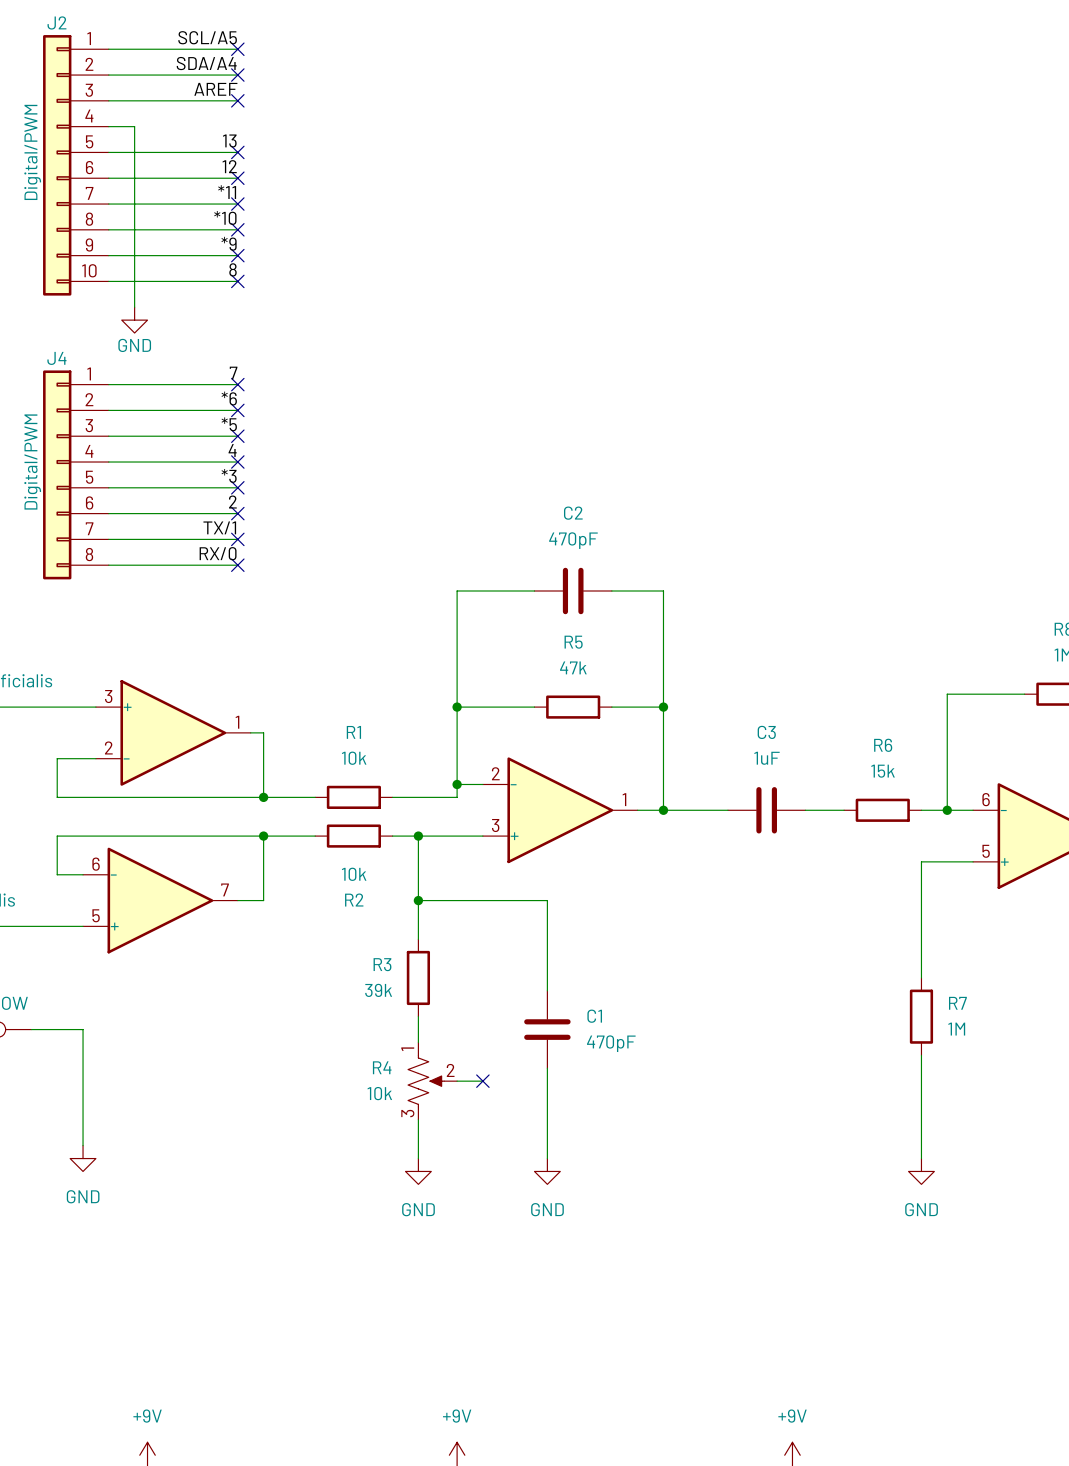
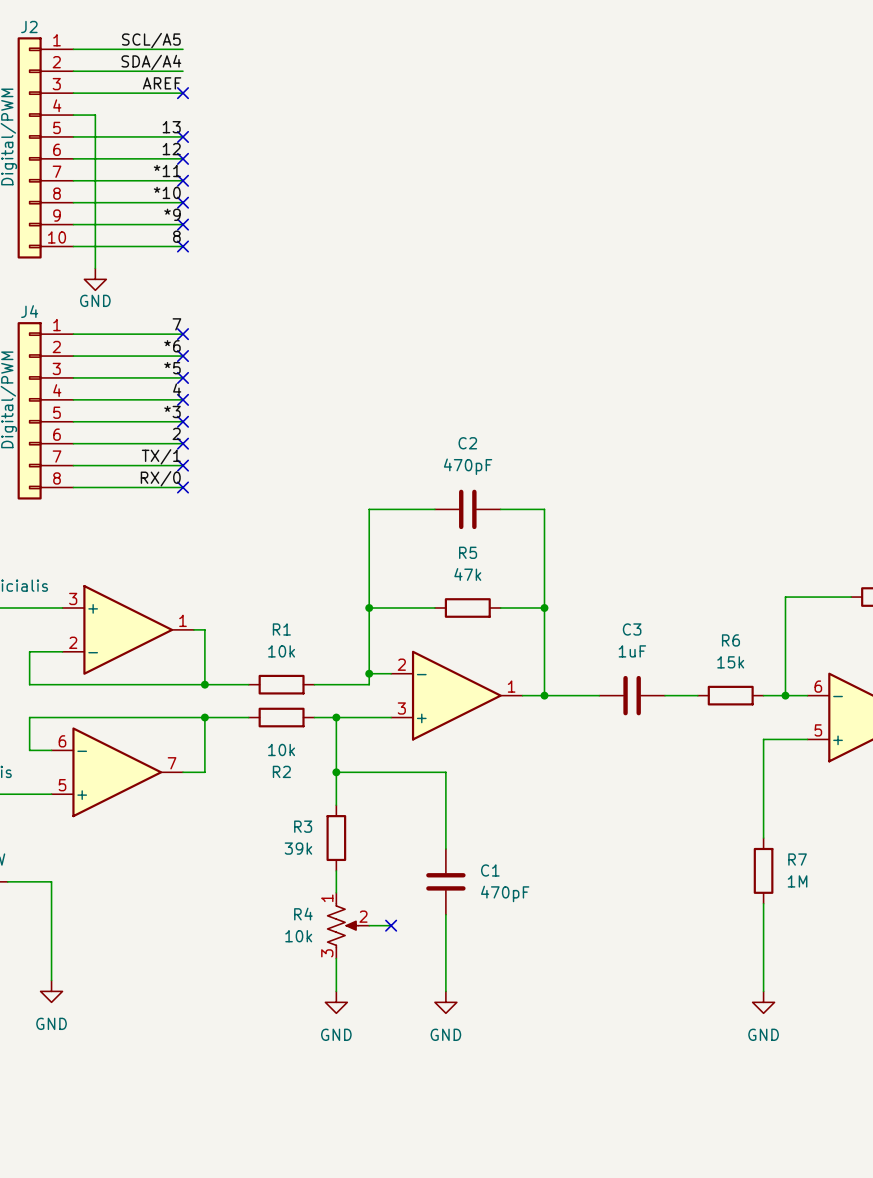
no-connect mark: (237, 49) -> none
no-connect mark: (237, 75) -> none

